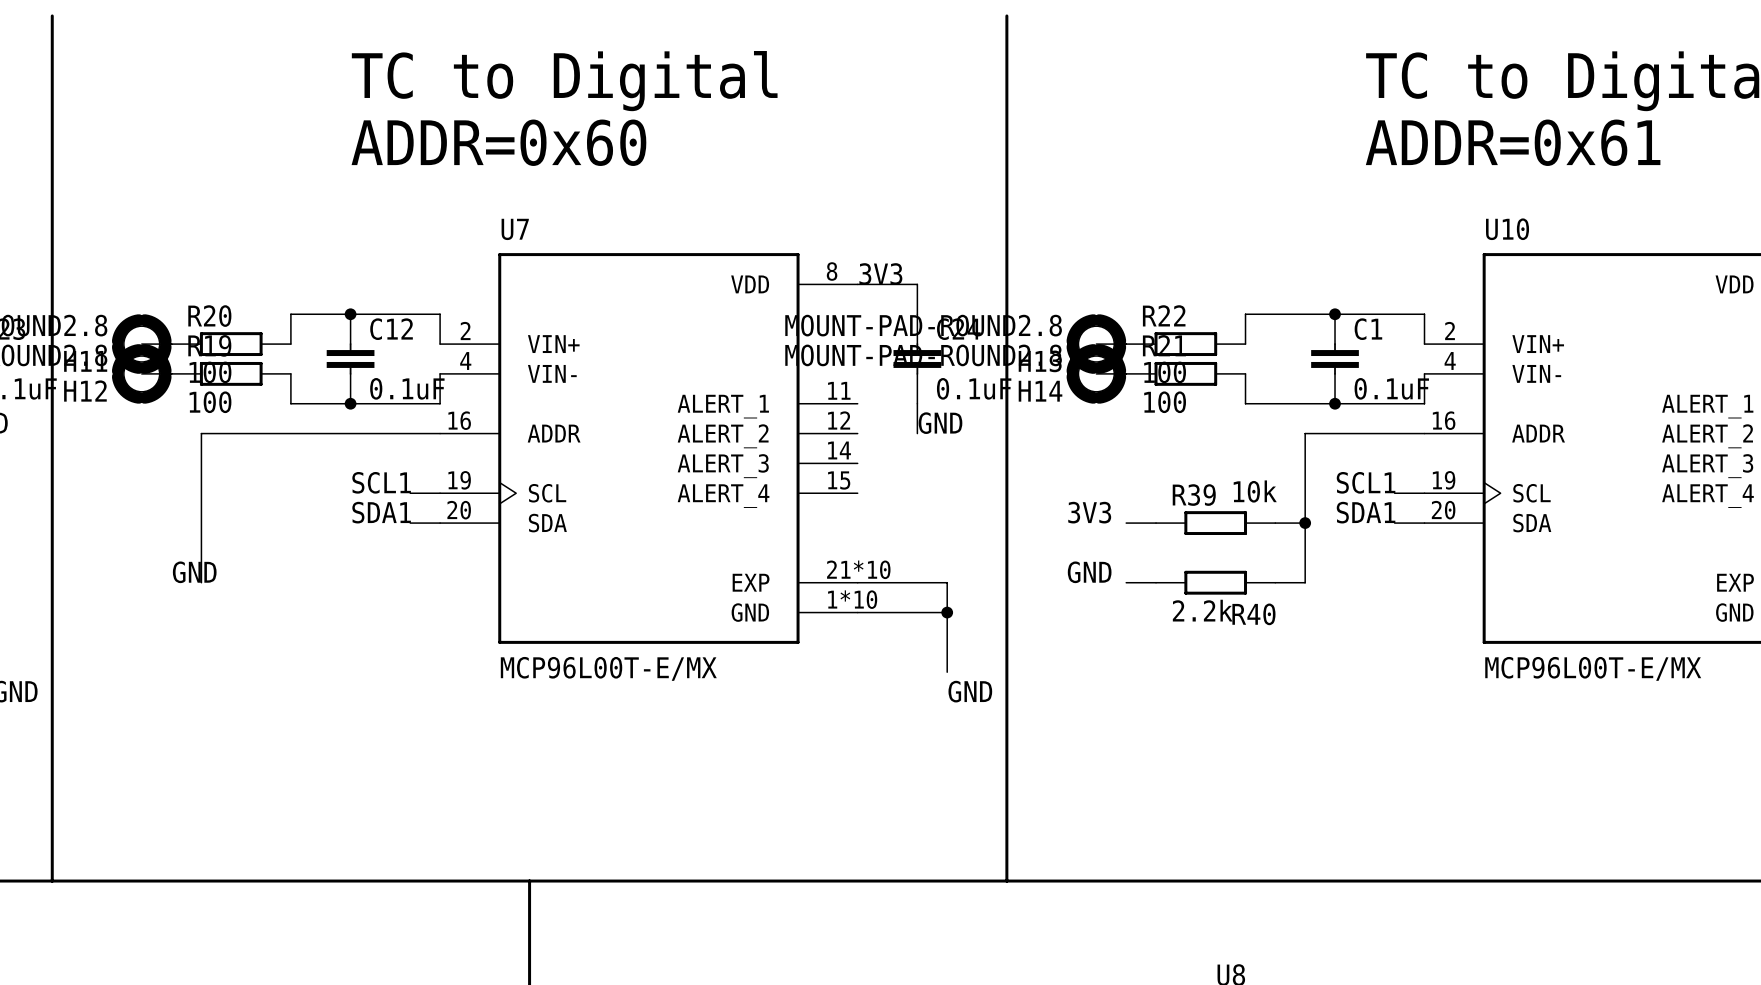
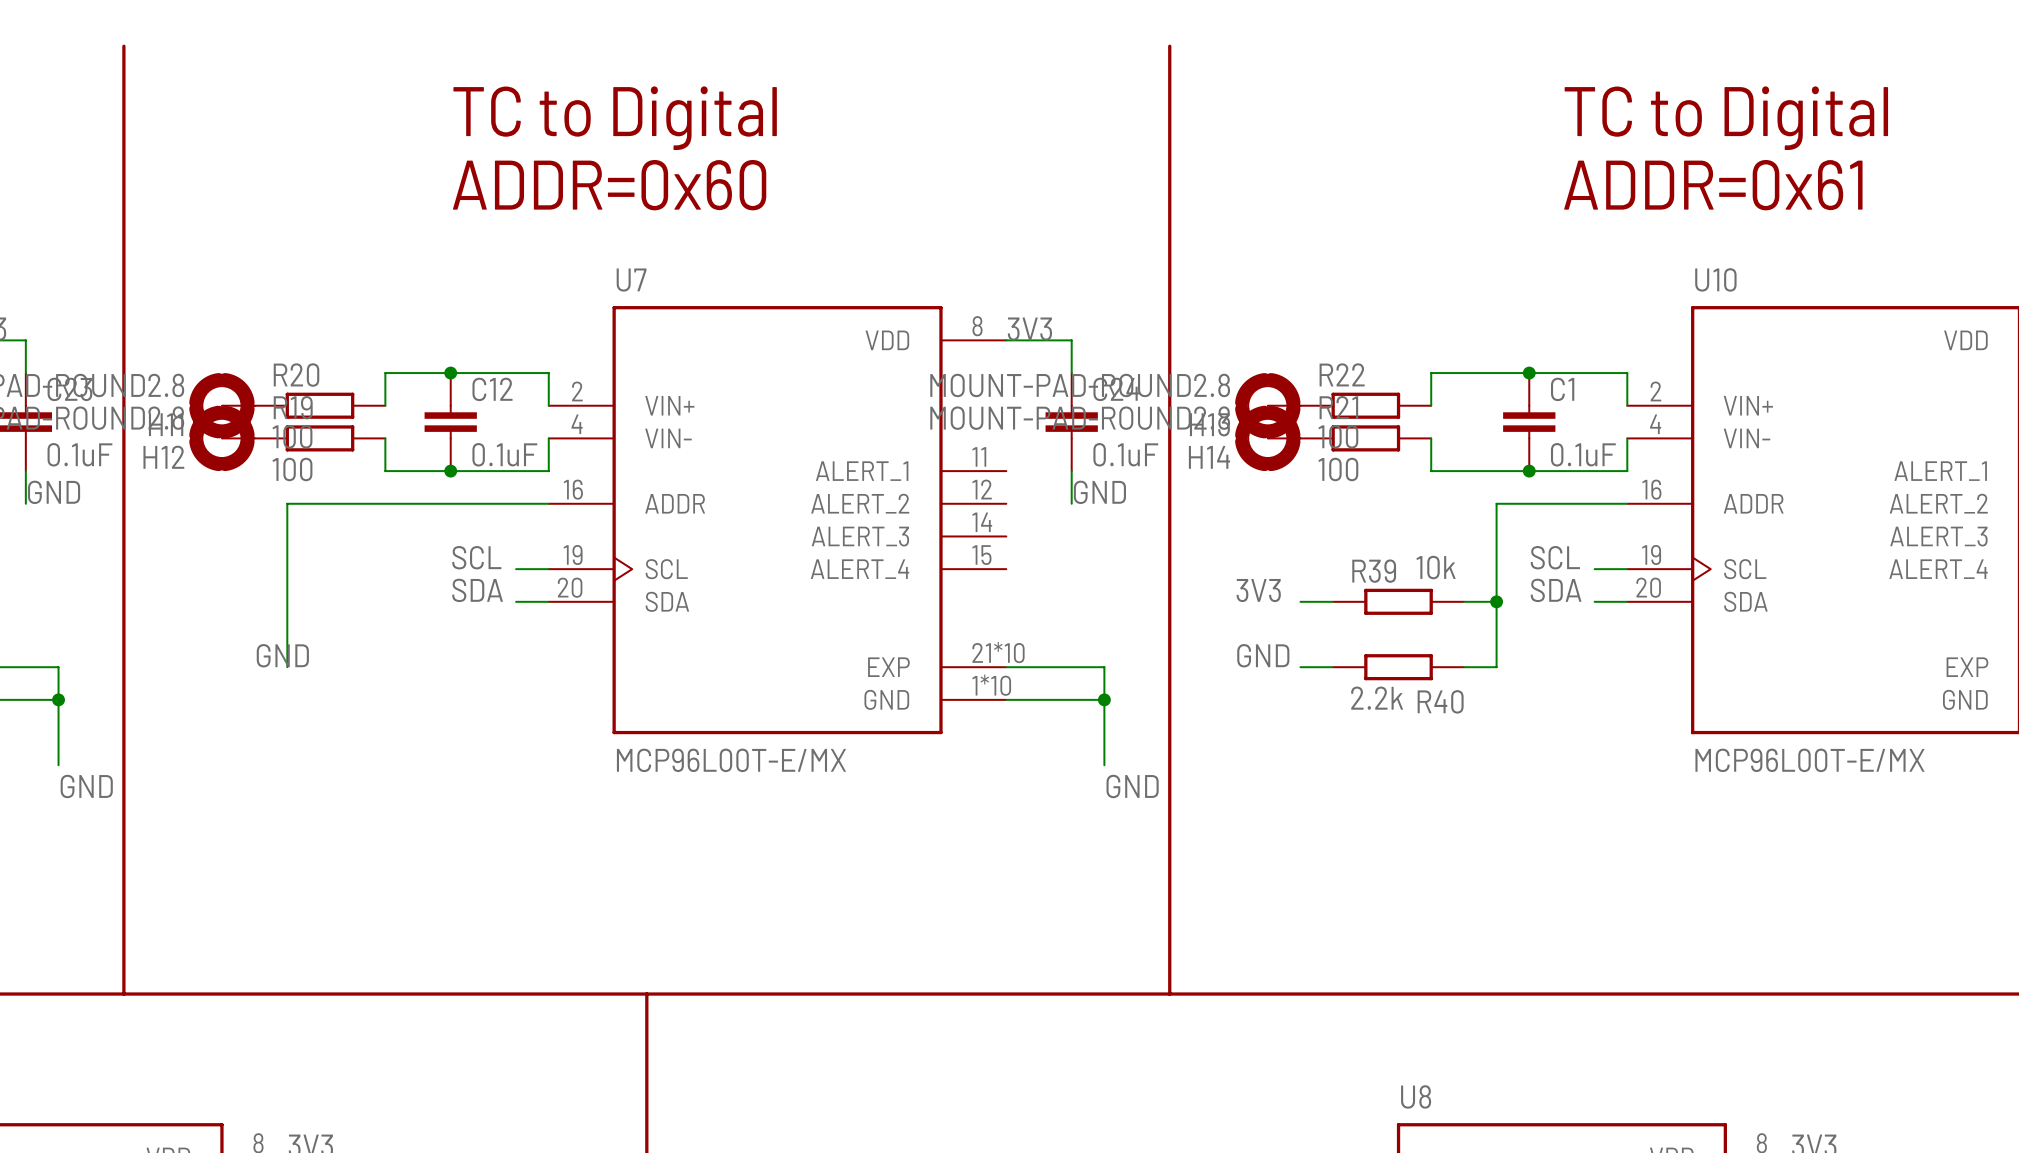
label: SCL1 (381, 482) -> SCL (476, 557)
label: SCL1 (1366, 482) -> SCL (1555, 557)
label: SDA1 (381, 512) -> SDA (477, 590)
label: SDA1 (1366, 512) -> SDA (1556, 590)

